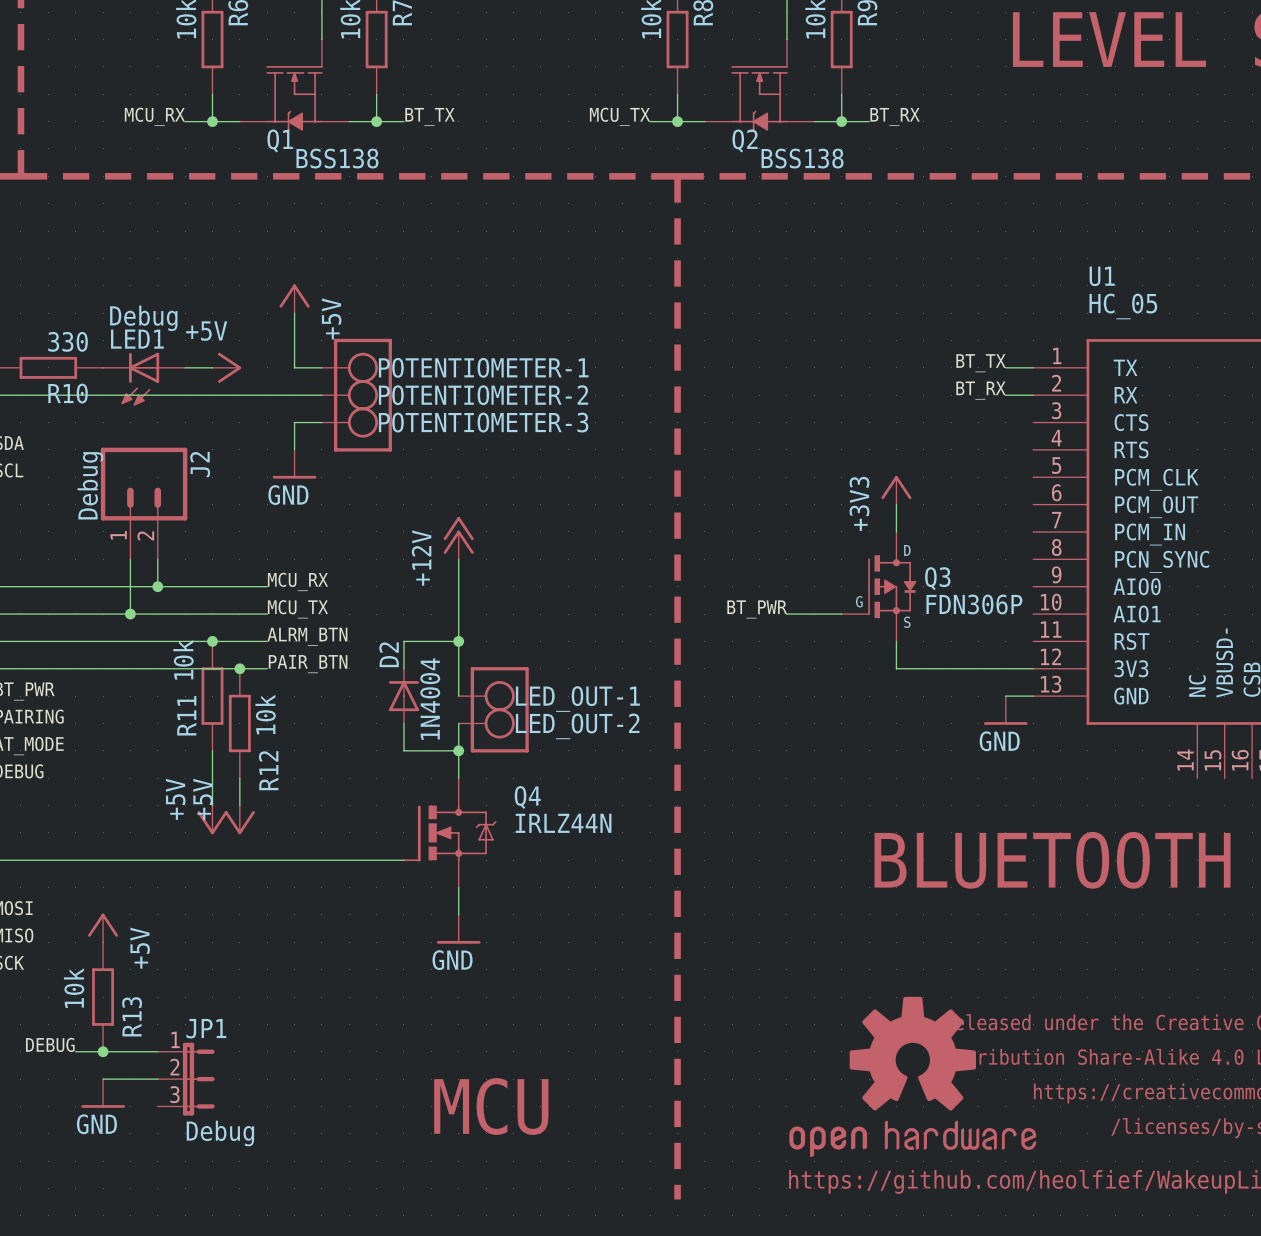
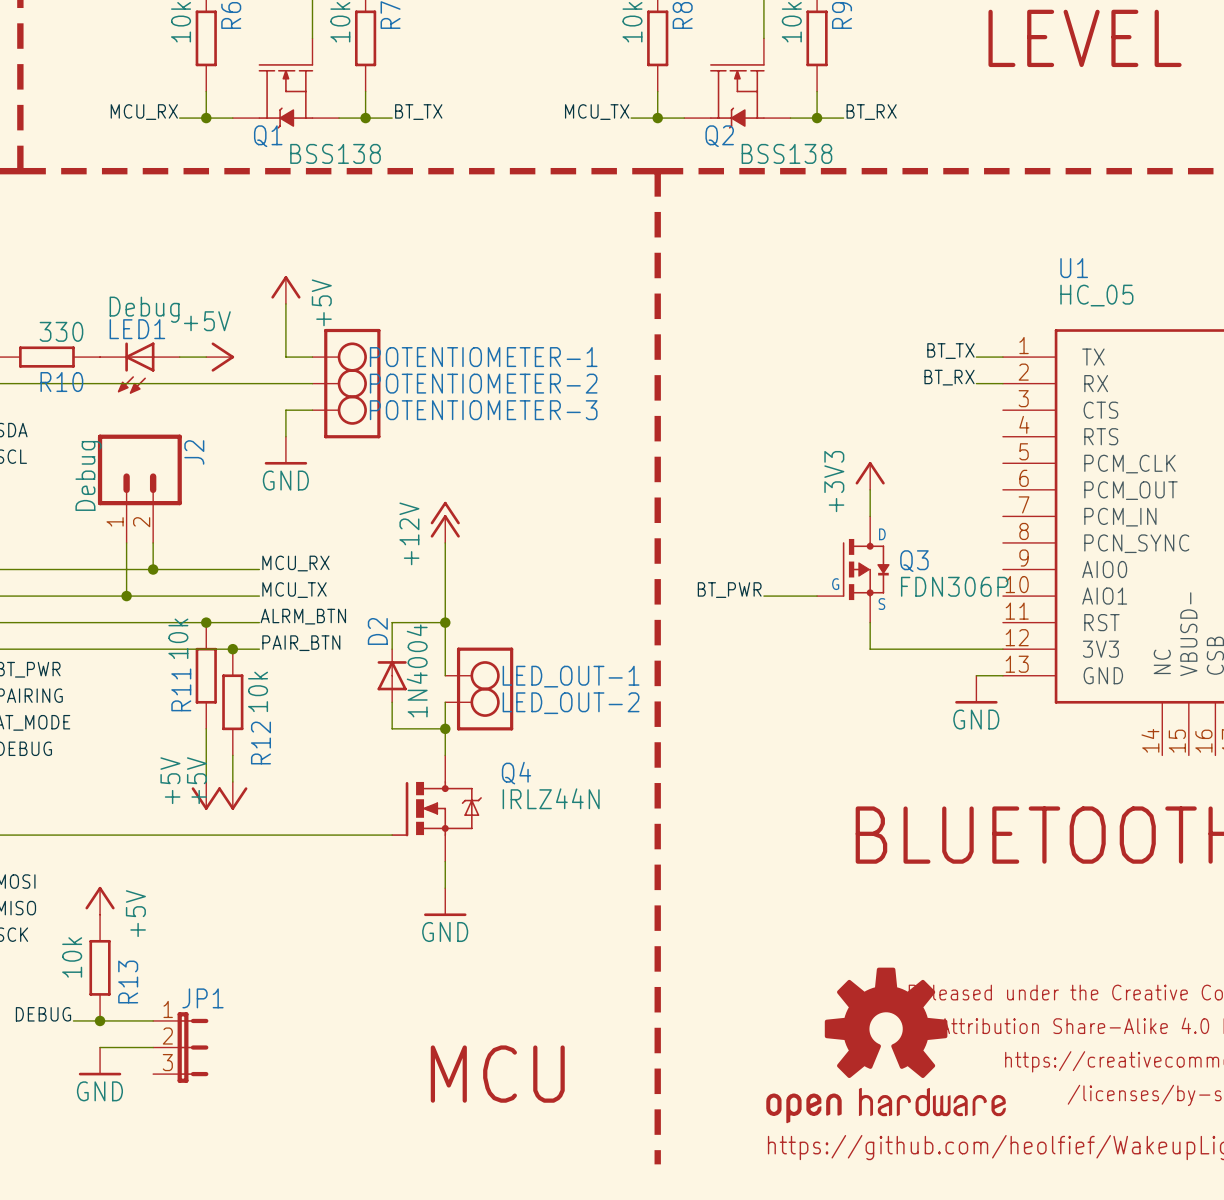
JP1 value: Debug (220, 1133) -> none

